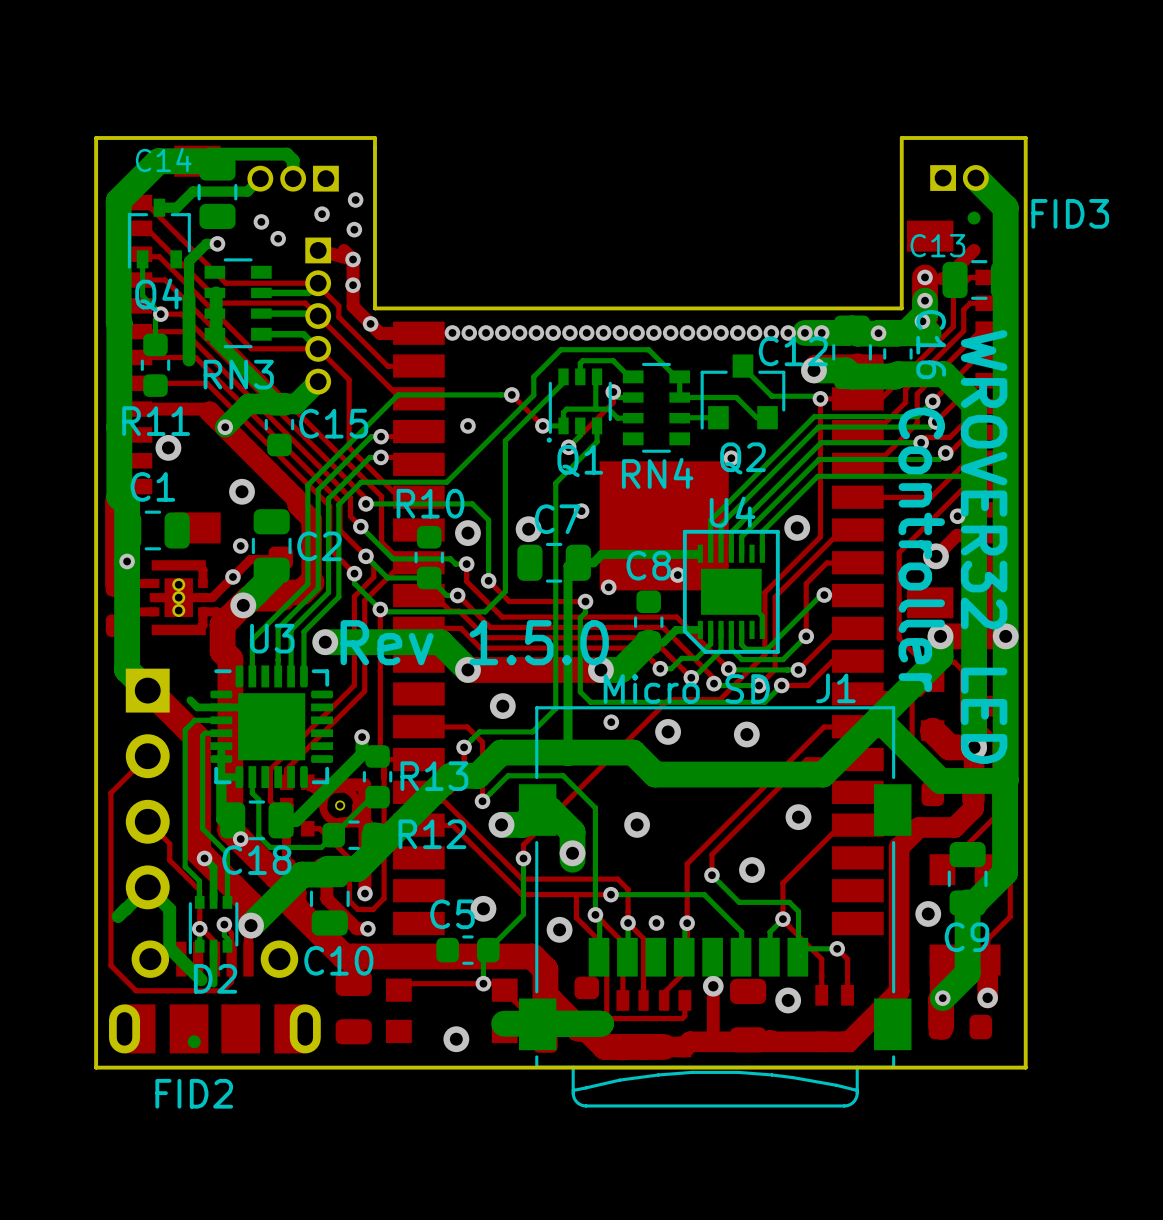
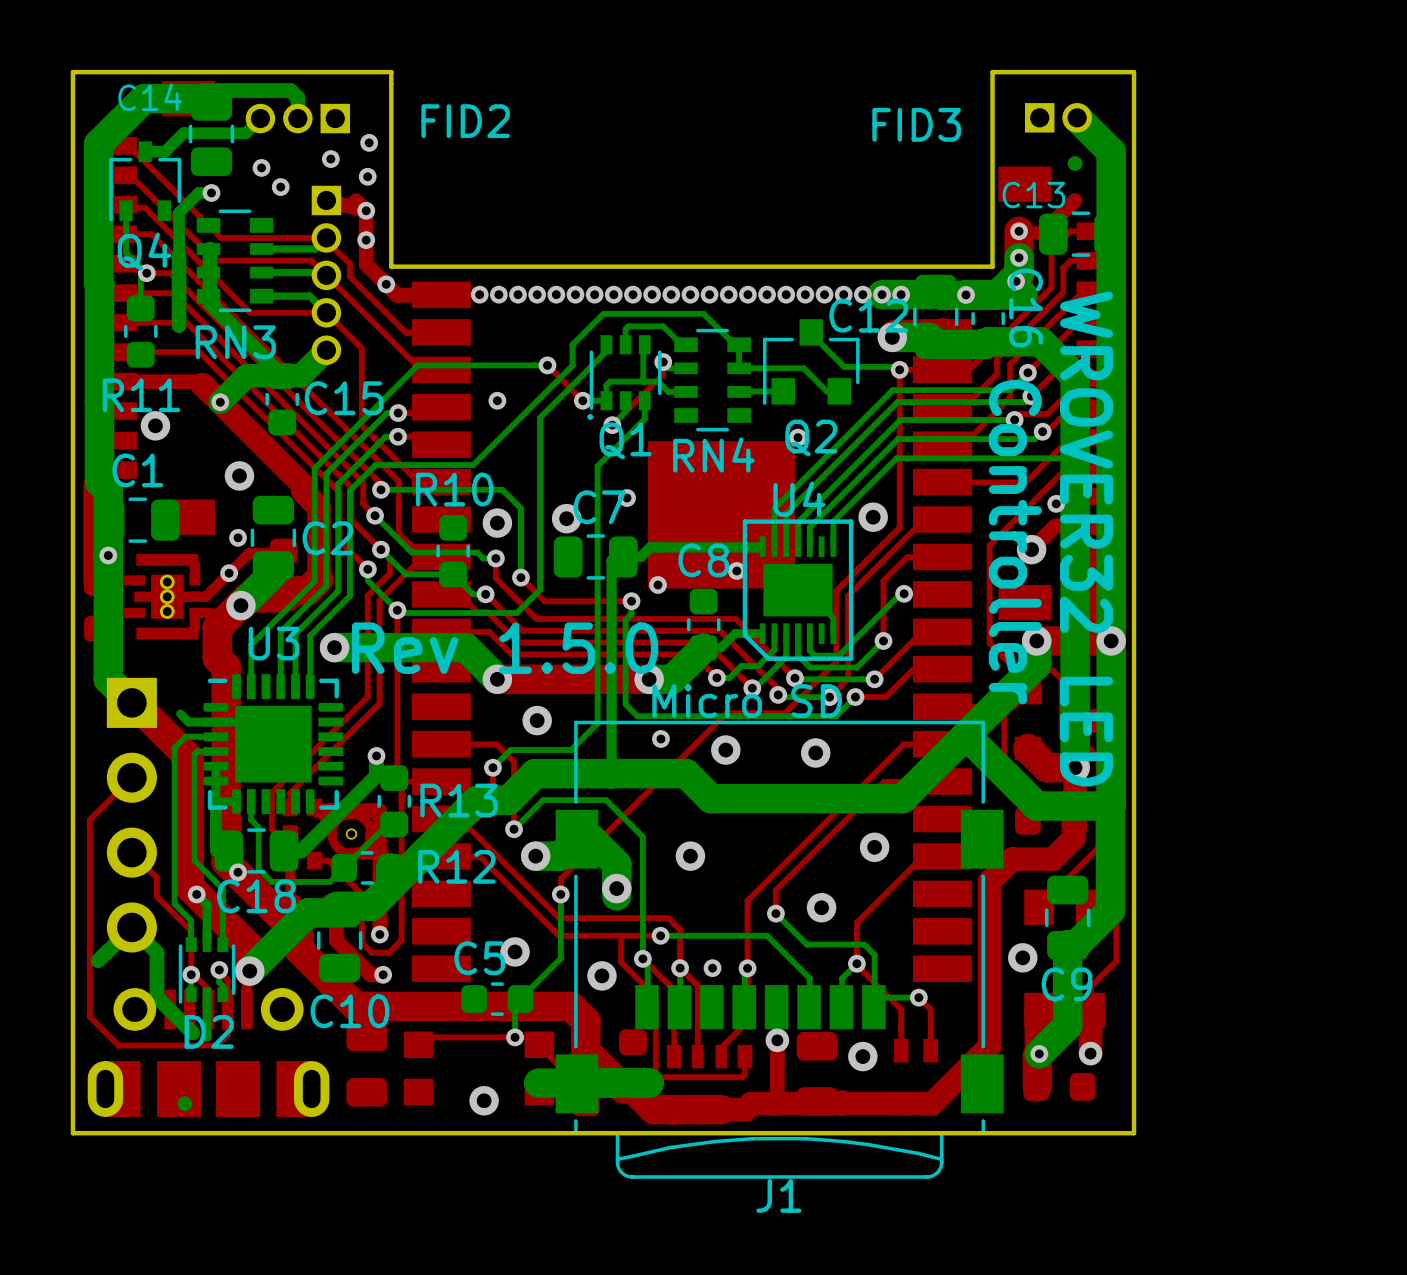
FID3 name position: FID3 (1070, 213) -> FID3 (916, 124)
J1 name position: J1 (835, 688) -> J1 (778, 1195)
FID2 name position: FID2 (194, 1093) -> FID2 (465, 121)

